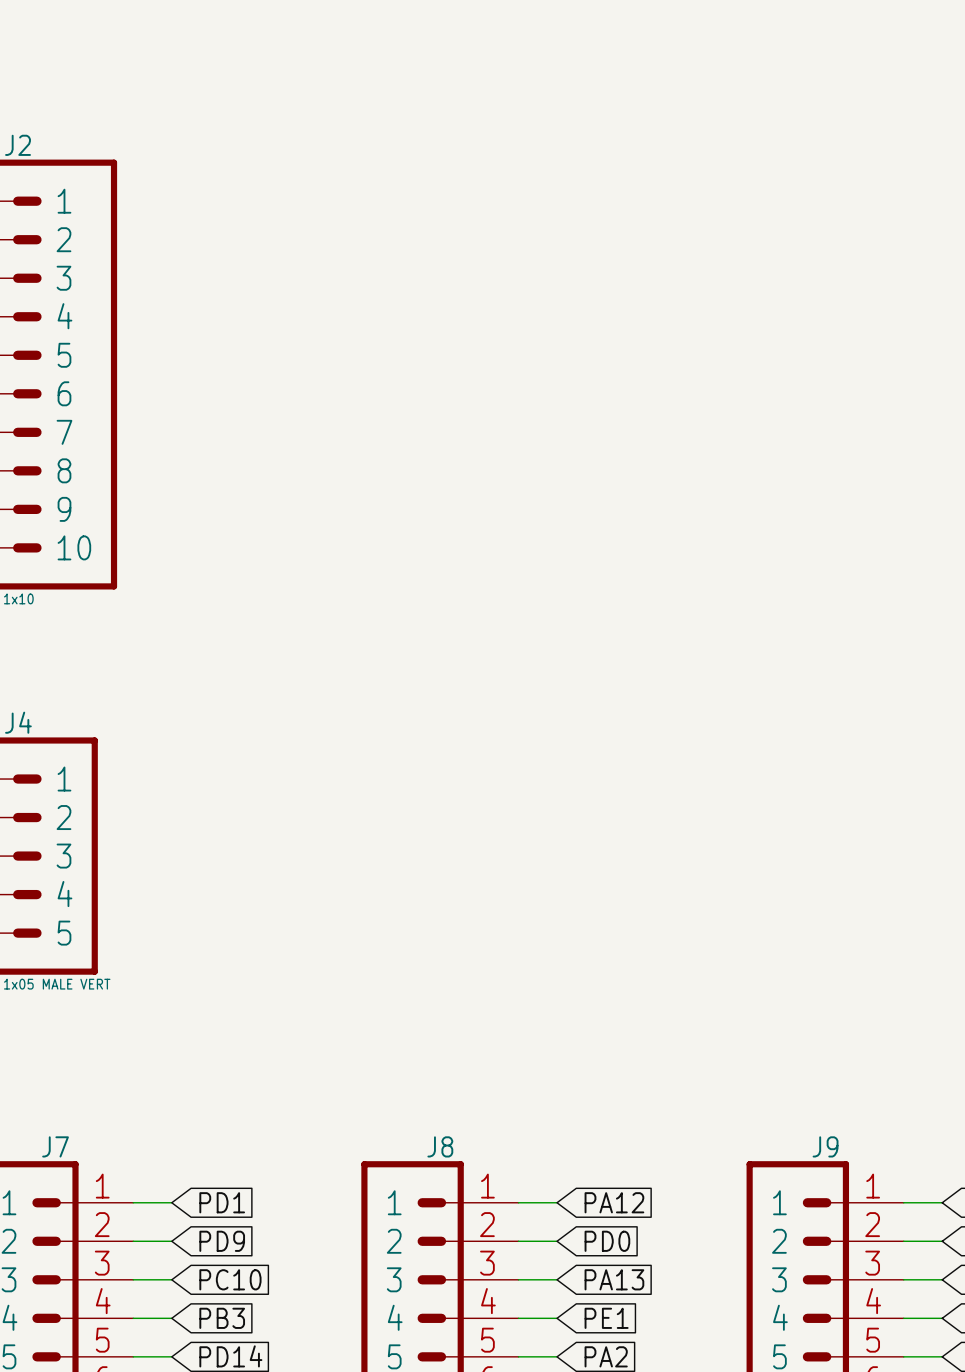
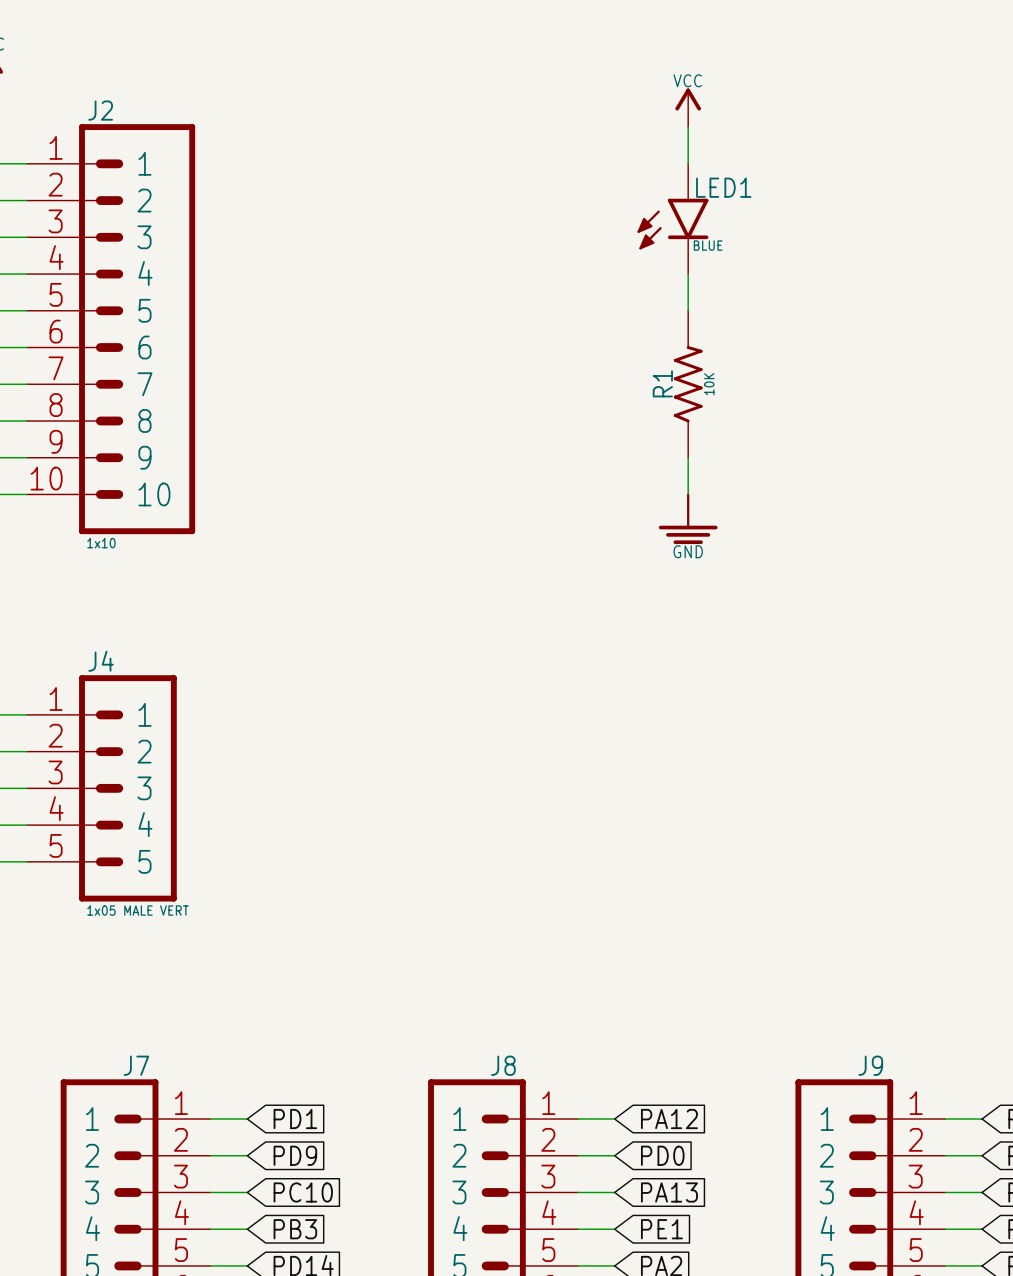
power symbol: none -> (688, 107)
wire: none -> (688, 127) (688, 163)
LED1: none -> BLUE (672, 218)
wire: none -> (688, 274) (688, 310)
R1: none -> 10K (688, 384)
wire: none -> (688, 457) (688, 494)
power symbol: none -> (688, 518)

